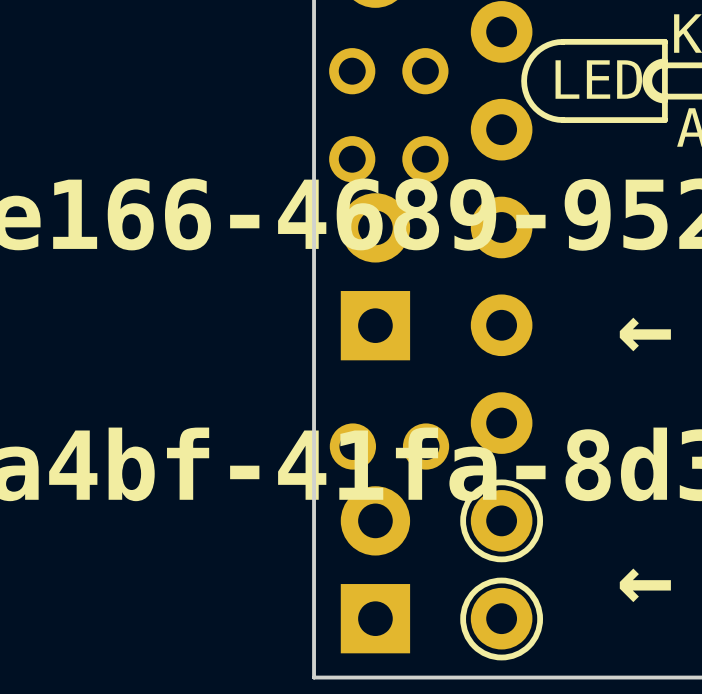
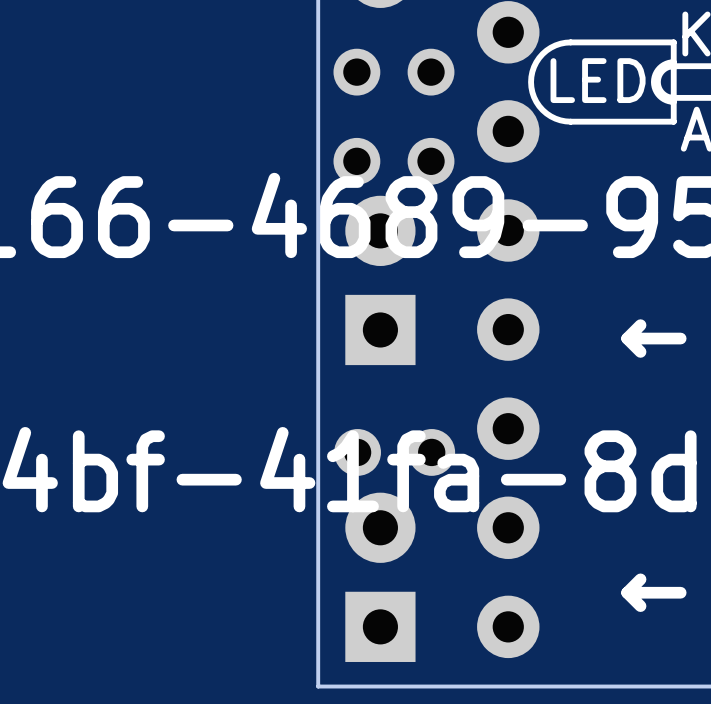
drawing: [460, 479, 544, 661] -> none

